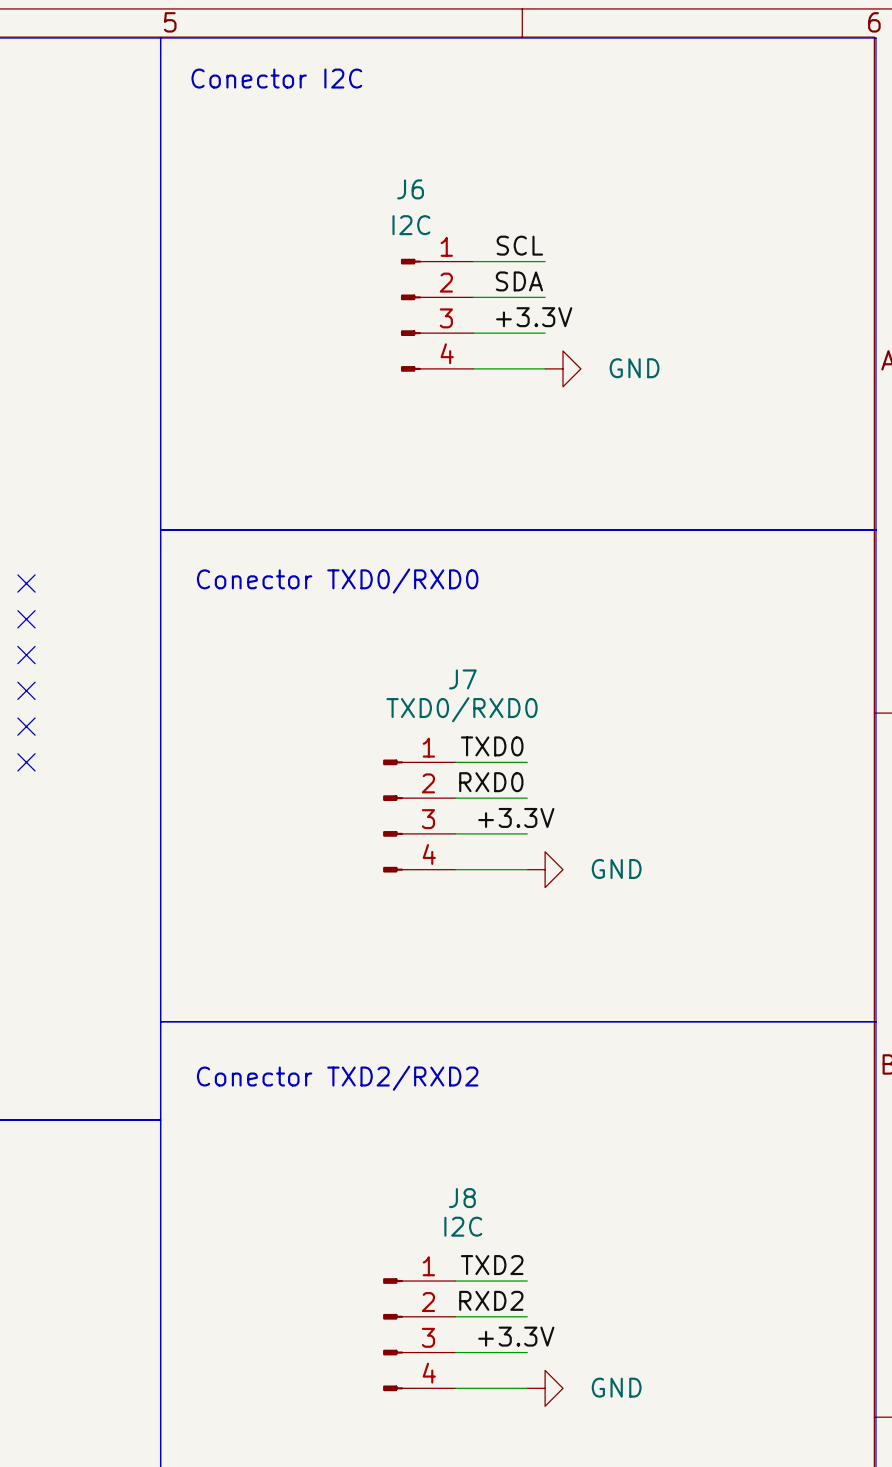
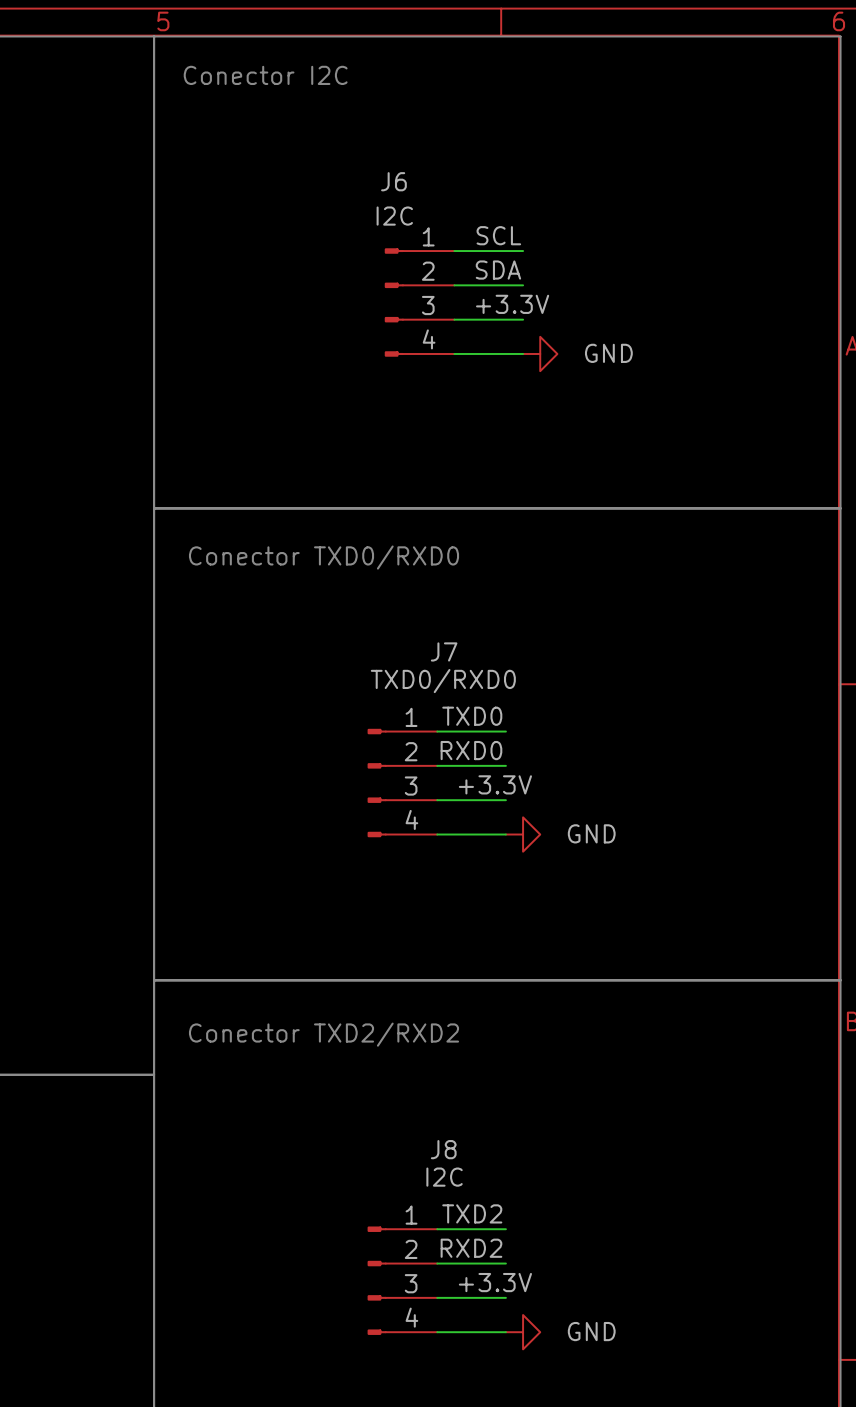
no-connect mark: (26, 583) -> none
no-connect mark: (26, 619) -> none
no-connect mark: (26, 655) -> none
no-connect mark: (26, 690) -> none
no-connect mark: (26, 726) -> none
no-connect mark: (26, 762) -> none

